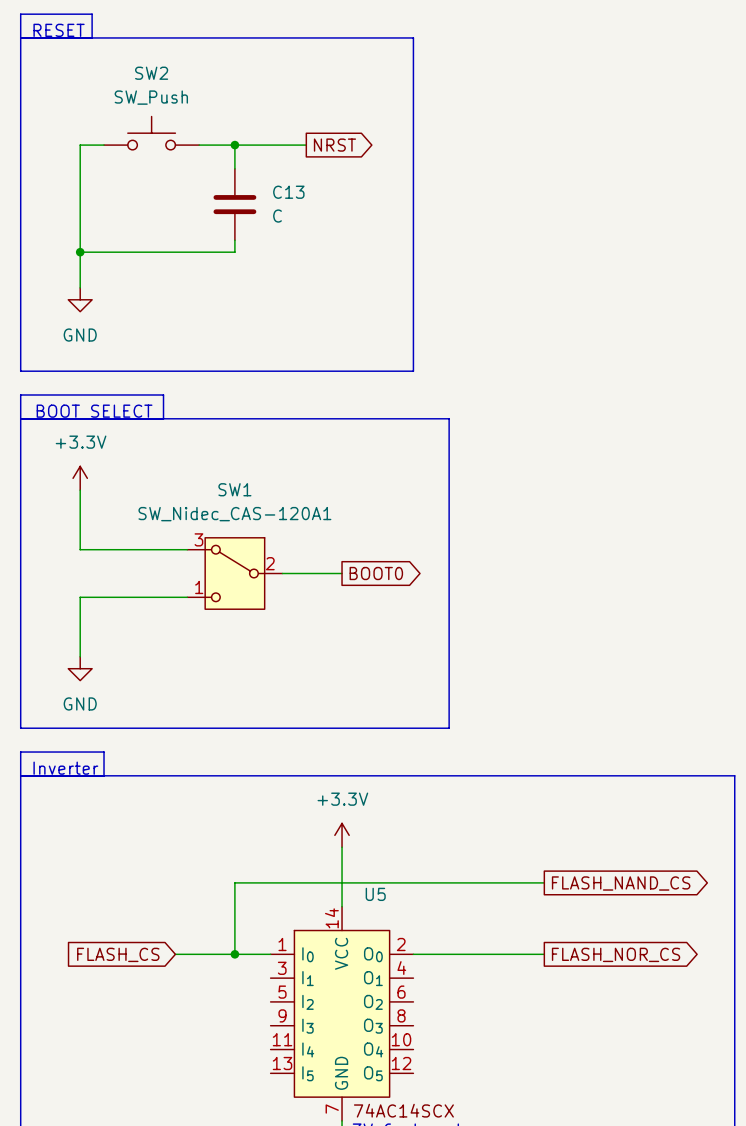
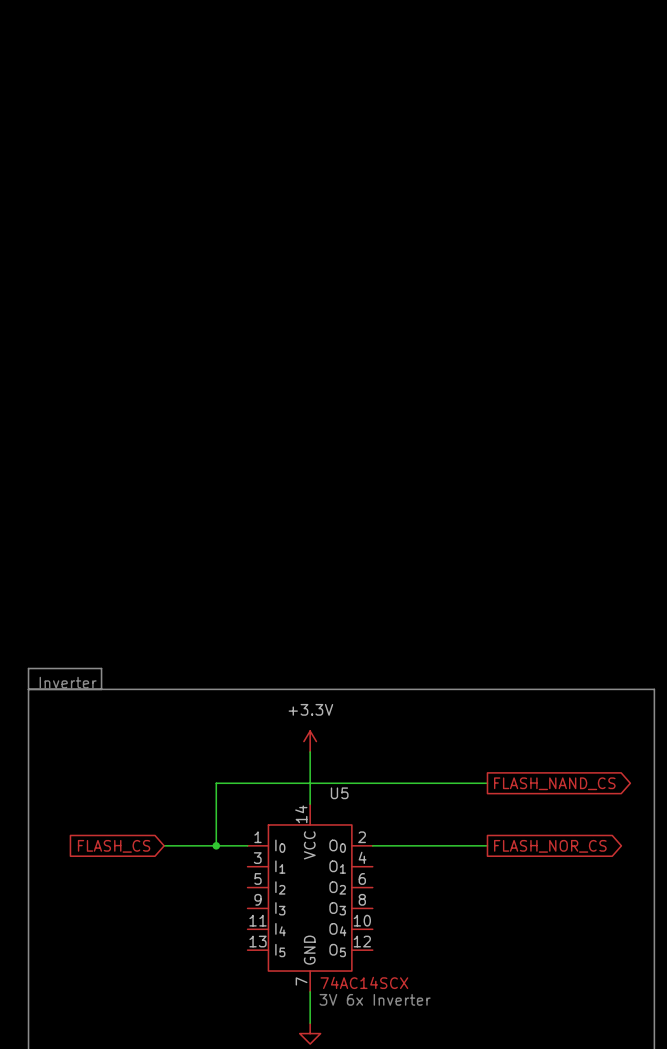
text: RESET (59, 30) -> none
line: (20, 37) (413, 37) (413, 371) (20, 371) (20, 14) (92, 14) (92, 37) -> none
SW2: SW_Push (151, 133) -> none
wire: (104, 145) (80, 145) (80, 287) -> none
wire: (199, 145) (306, 145) -> none
wire: (234, 145) (234, 168) -> none
junction: (234, 145) -> none
global label: NRST (334, 145) -> none
C13: C (234, 204) -> none
wire: (234, 240) (234, 252) (80, 252) -> none
junction: (80, 252) -> none
power symbol: GND (80, 299) -> none
text: BOOT SELECT (94, 411) -> none
line: (20, 418) (449, 418) (449, 728) (20, 728) (20, 394) (163, 394) (163, 418) -> none
power symbol: +3.3V (80, 478) -> none
wire: (80, 490) (80, 549) (187, 549) -> none
SW1: SW_Nidec_CAS-120A1 (234, 573) -> none
wire: (282, 573) (342, 573) -> none
global label: BOOT0 (376, 573) -> none
wire: (187, 597) (80, 597) (80, 656) -> none
power symbol: GND (80, 668) -> none

